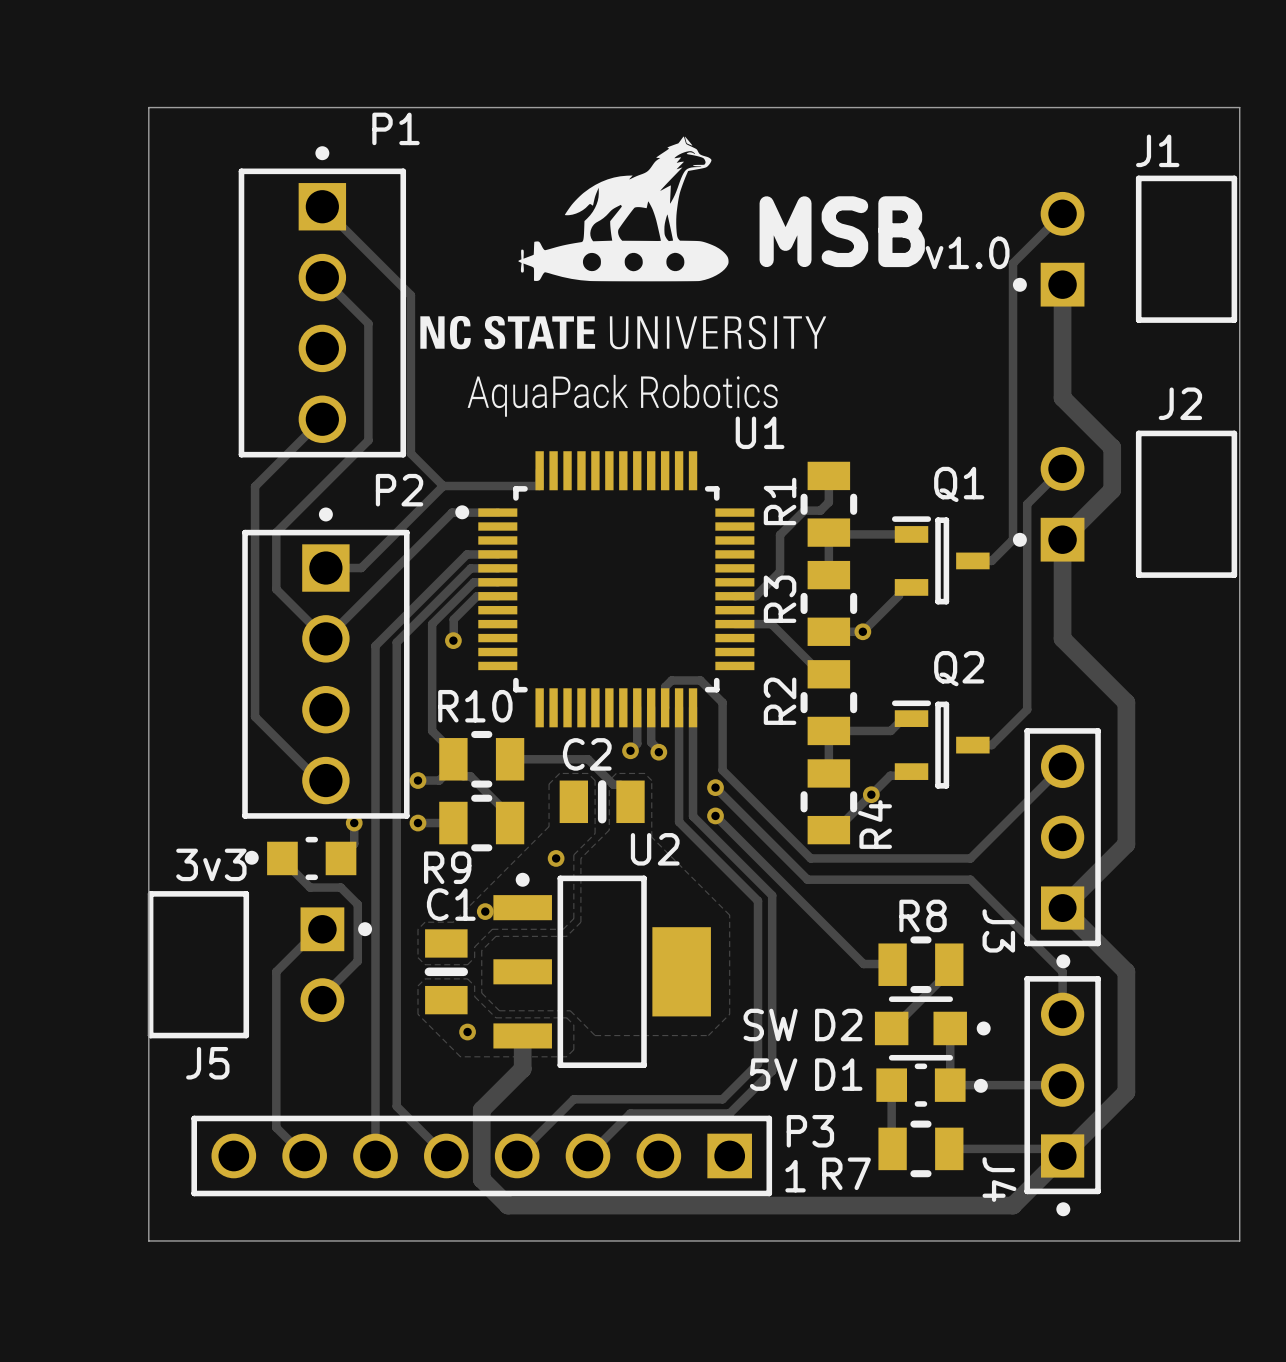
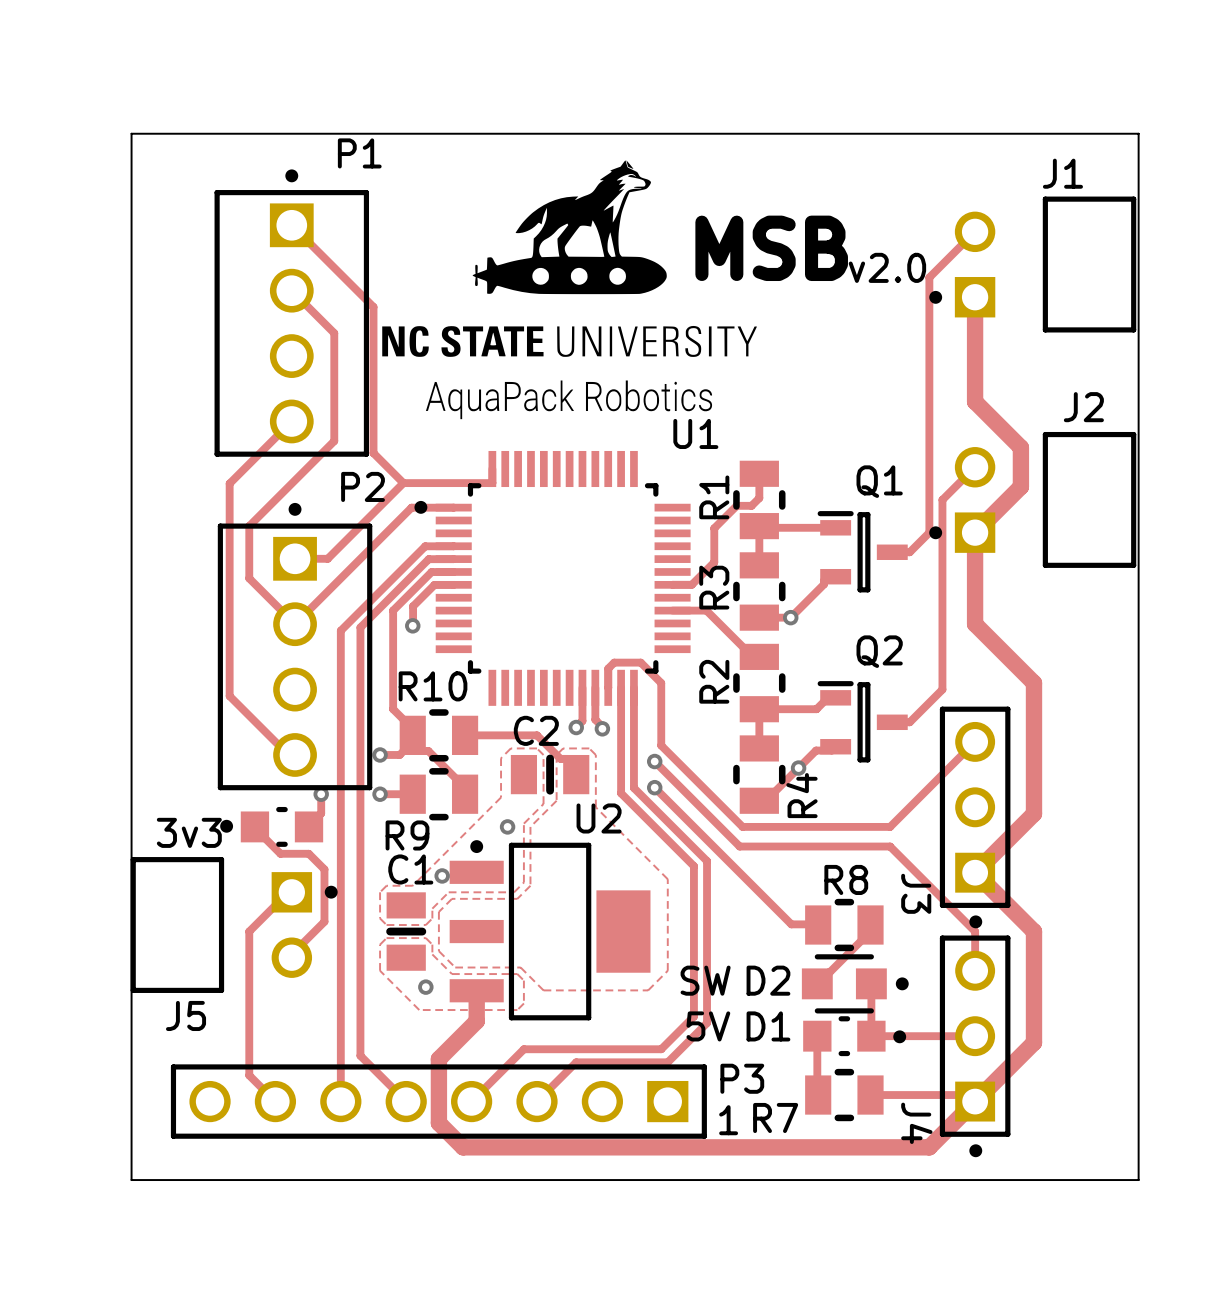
text: v1.0 (967, 252) -> v2.0 (887, 267)

